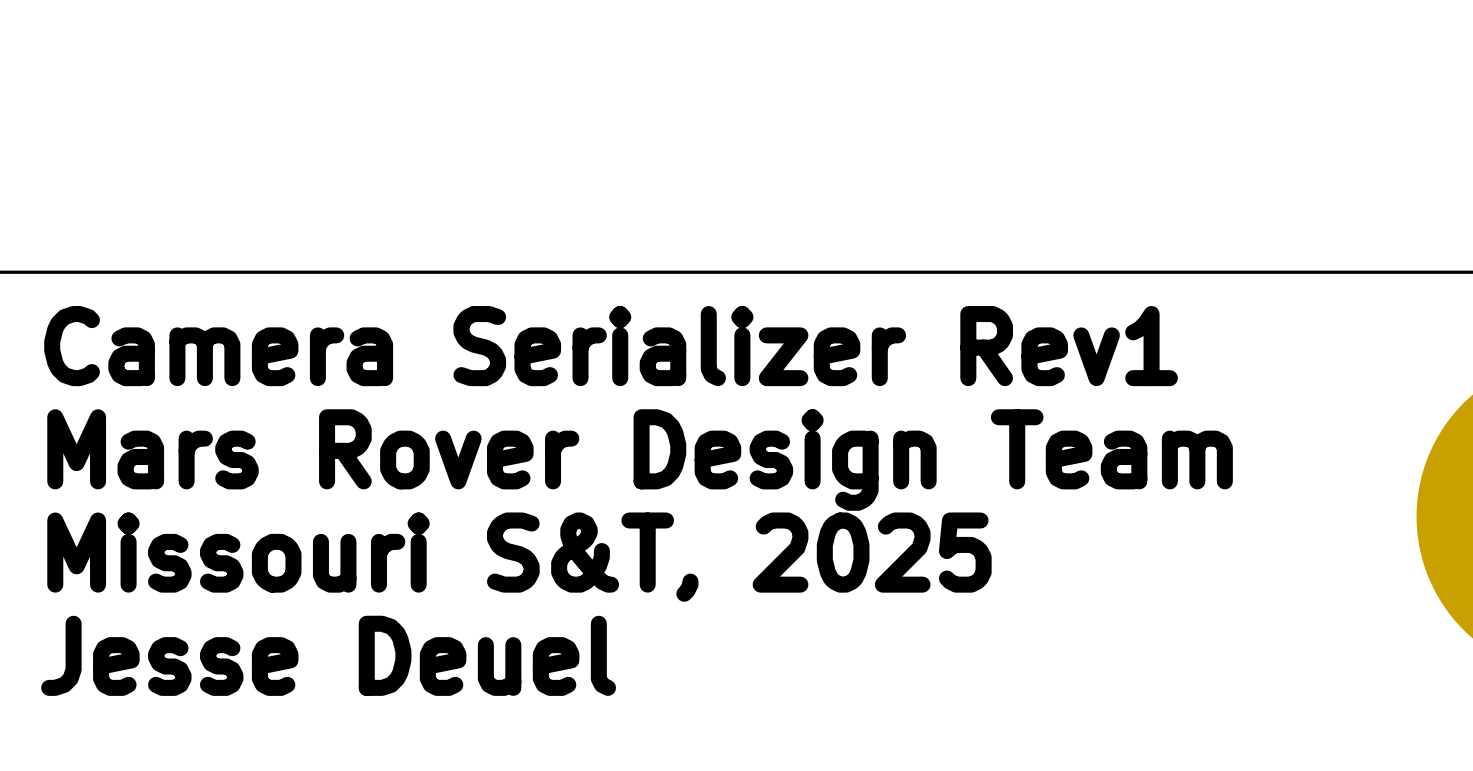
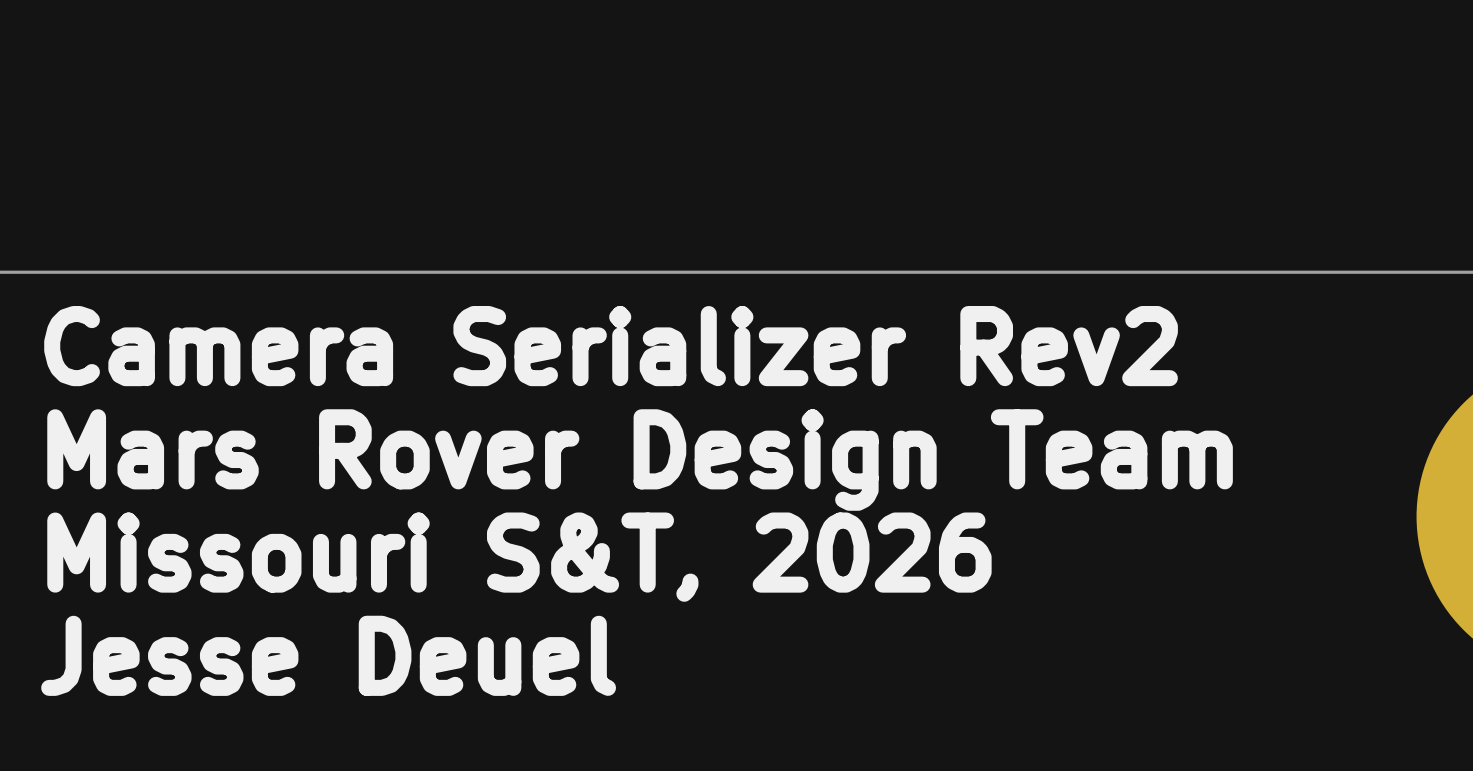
text: Camera Serializer Rev1 (611, 346) -> Camera Serializer Rev2 (611, 346)
text: Missouri S&T, 2025 (519, 557) -> Missouri S&T, 2026 (519, 557)

